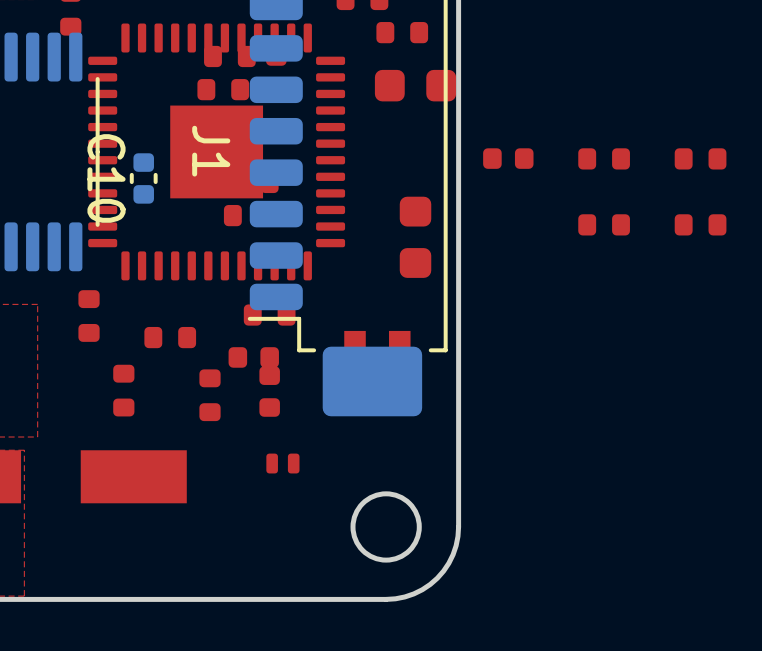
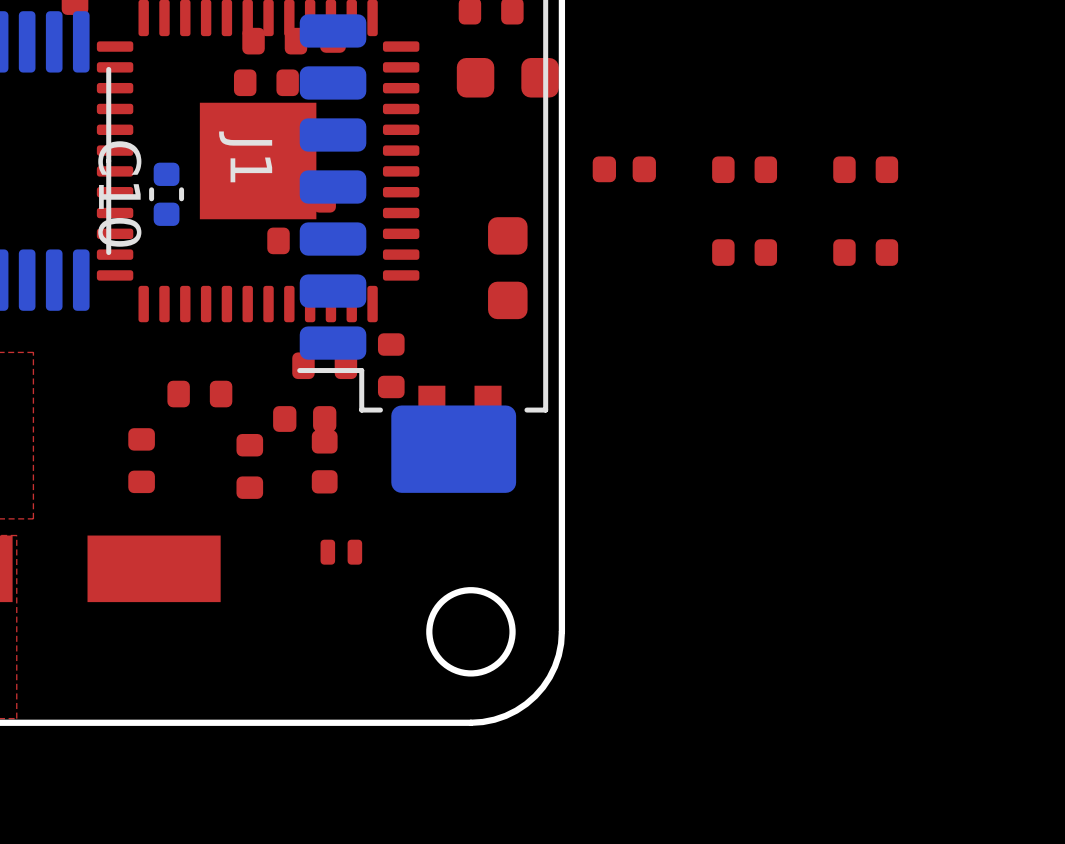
part position: (89, 316) -> (391, 365)

